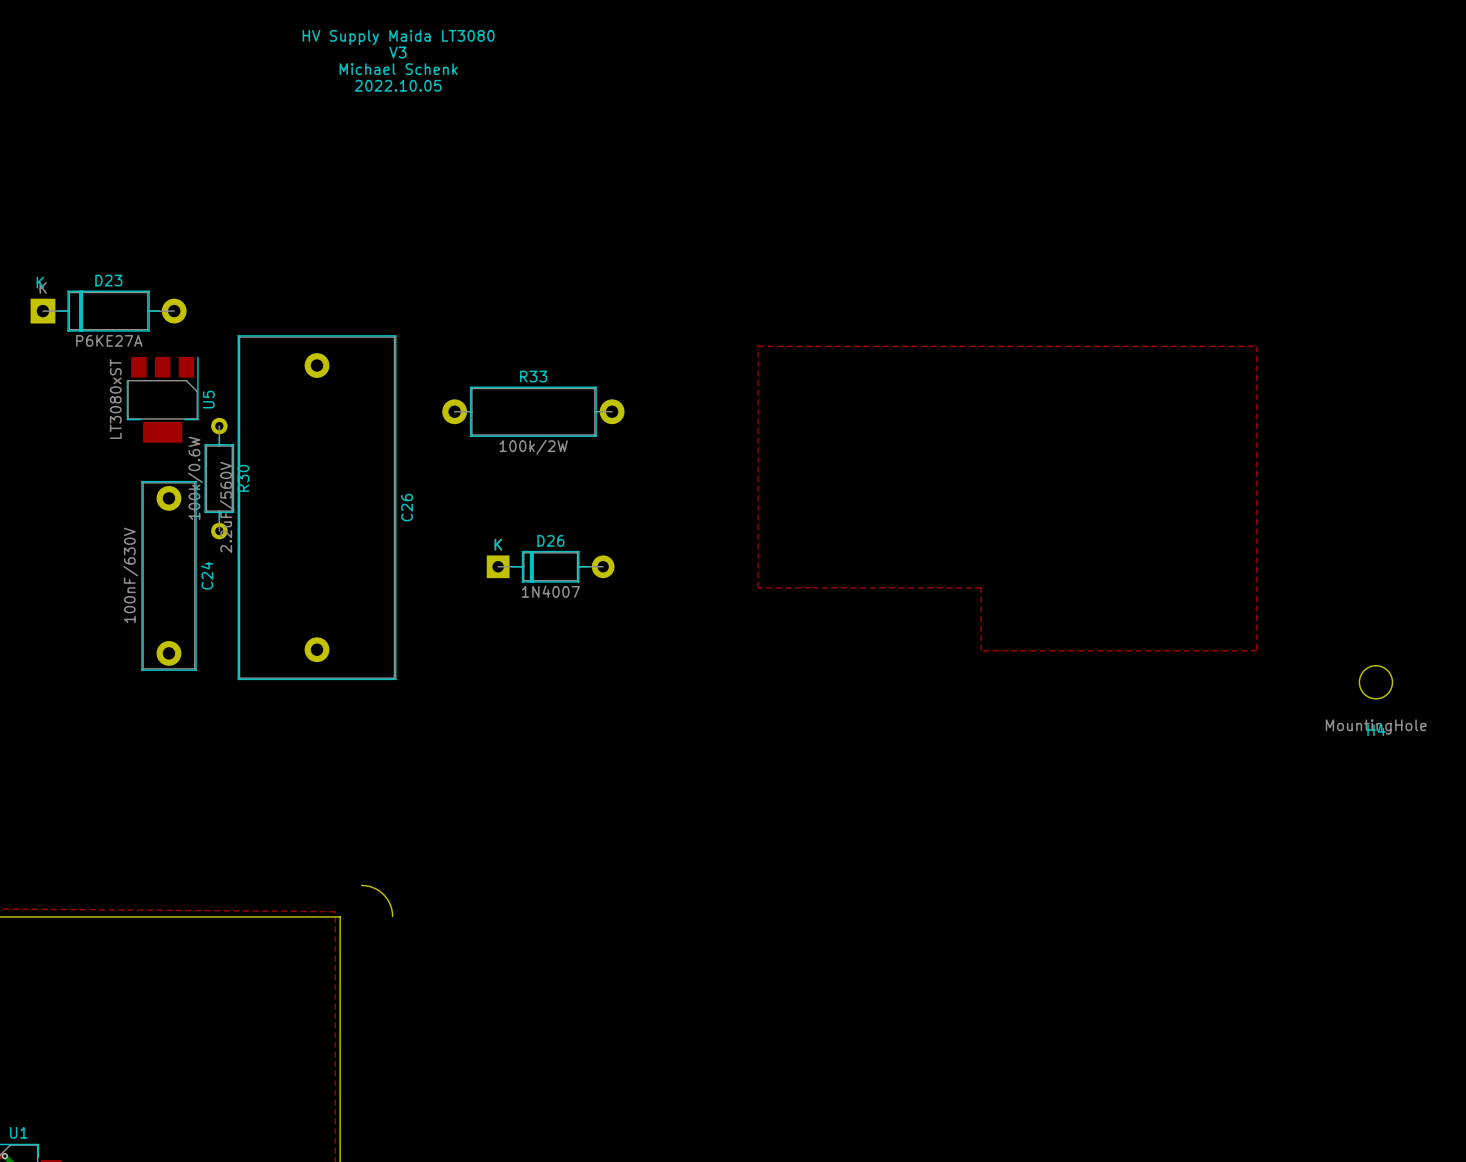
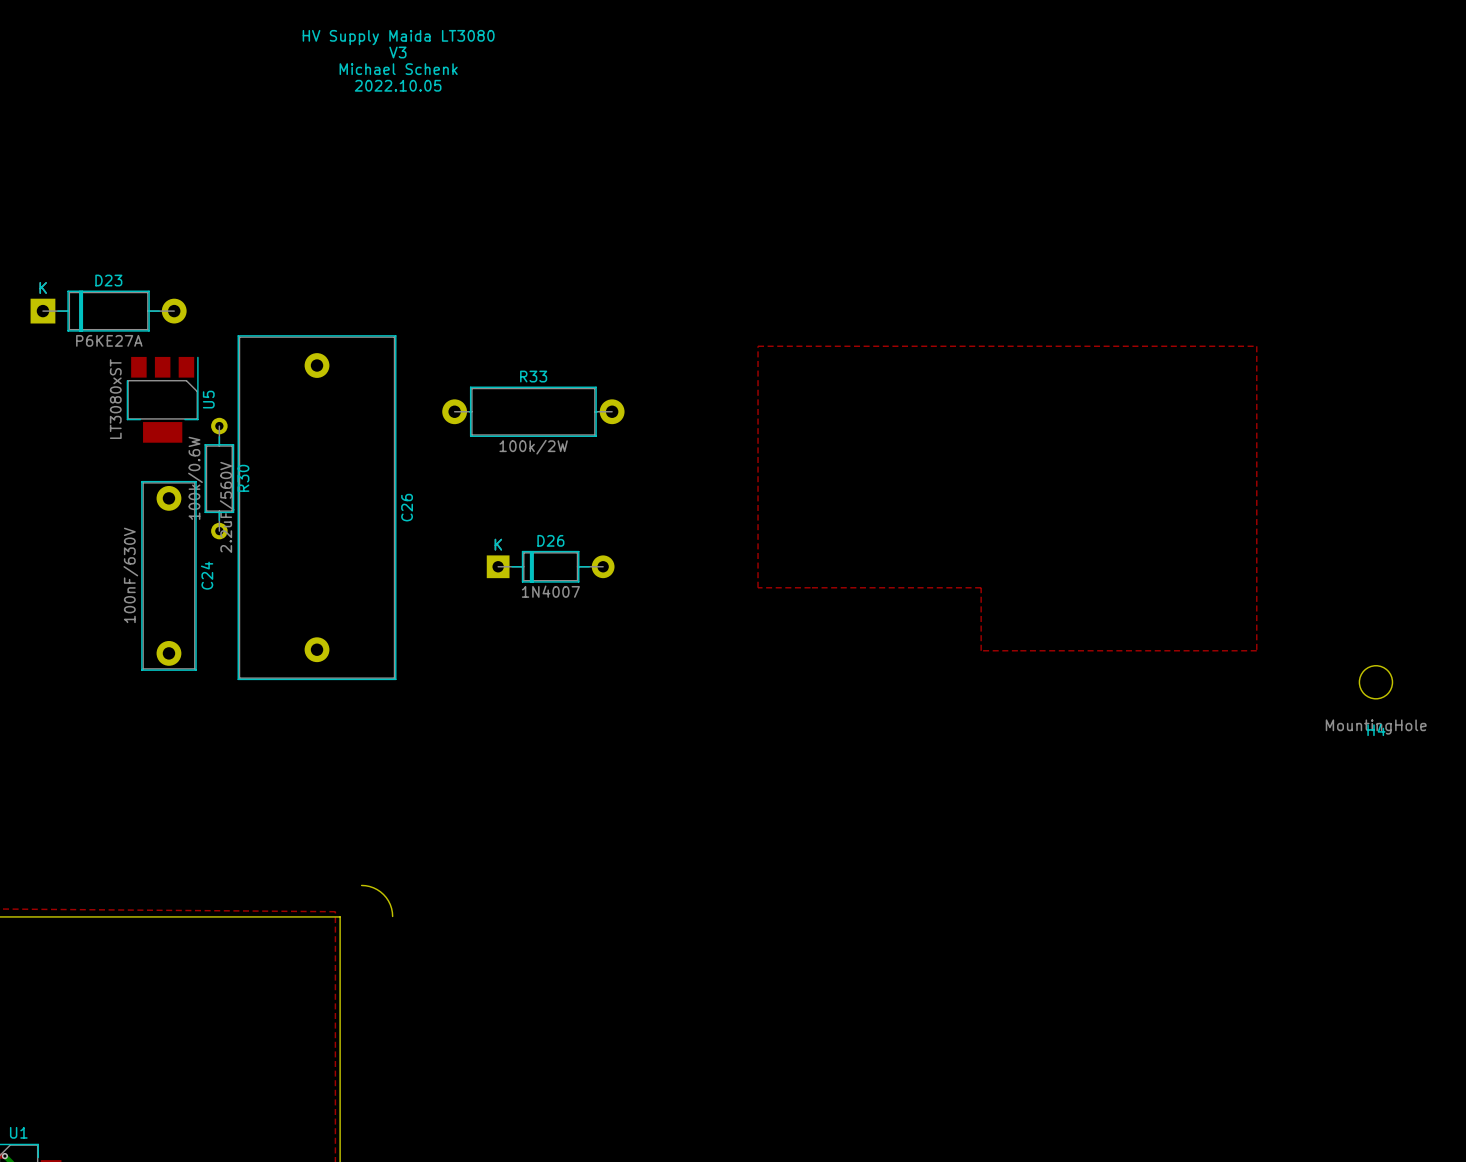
D23 footprint: [30, 290, 187, 332] -> [30, 290, 187, 332]

